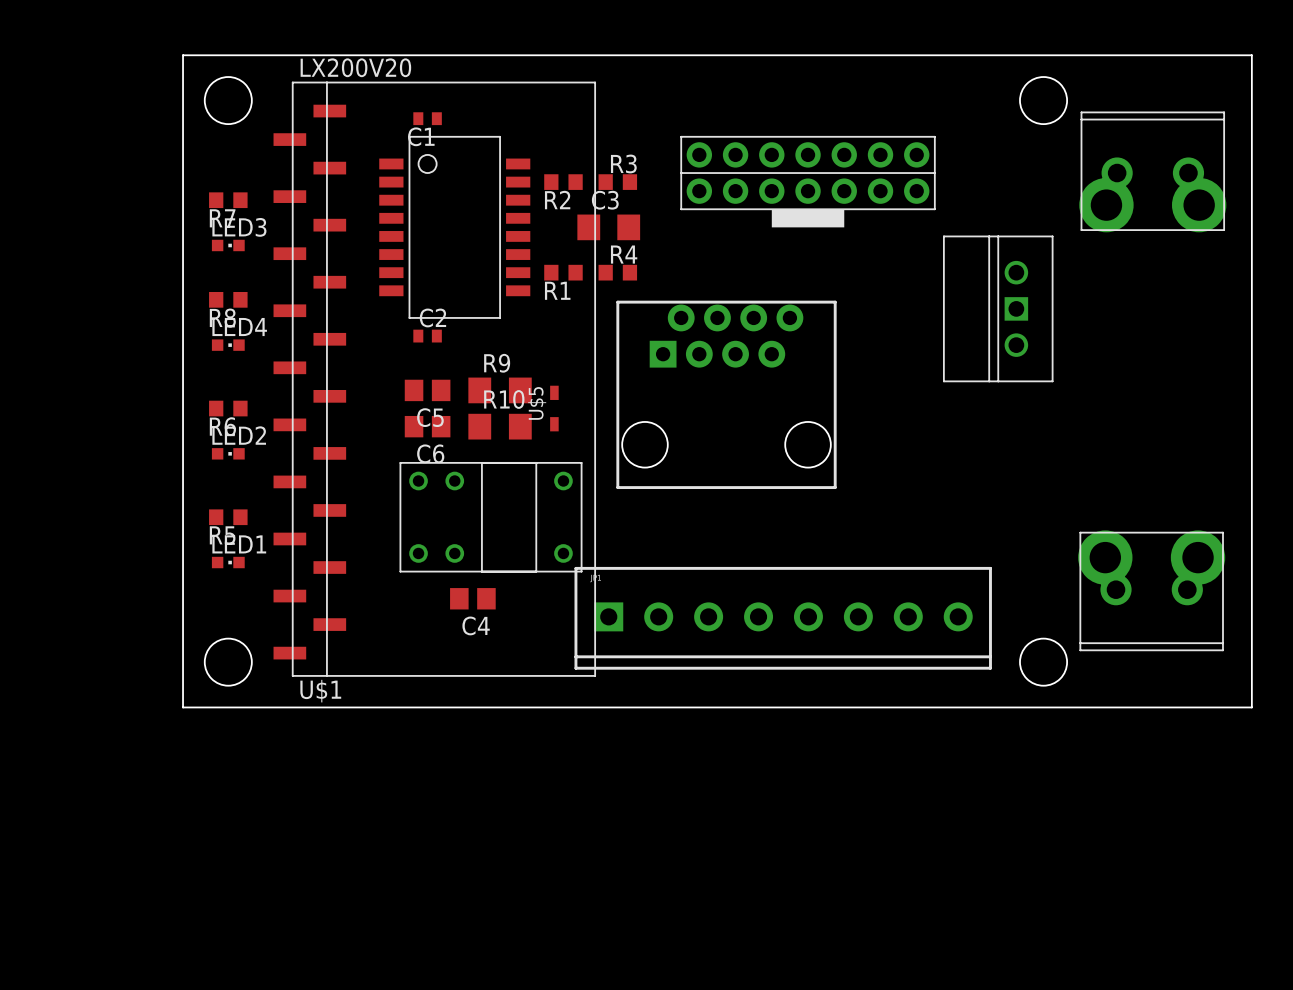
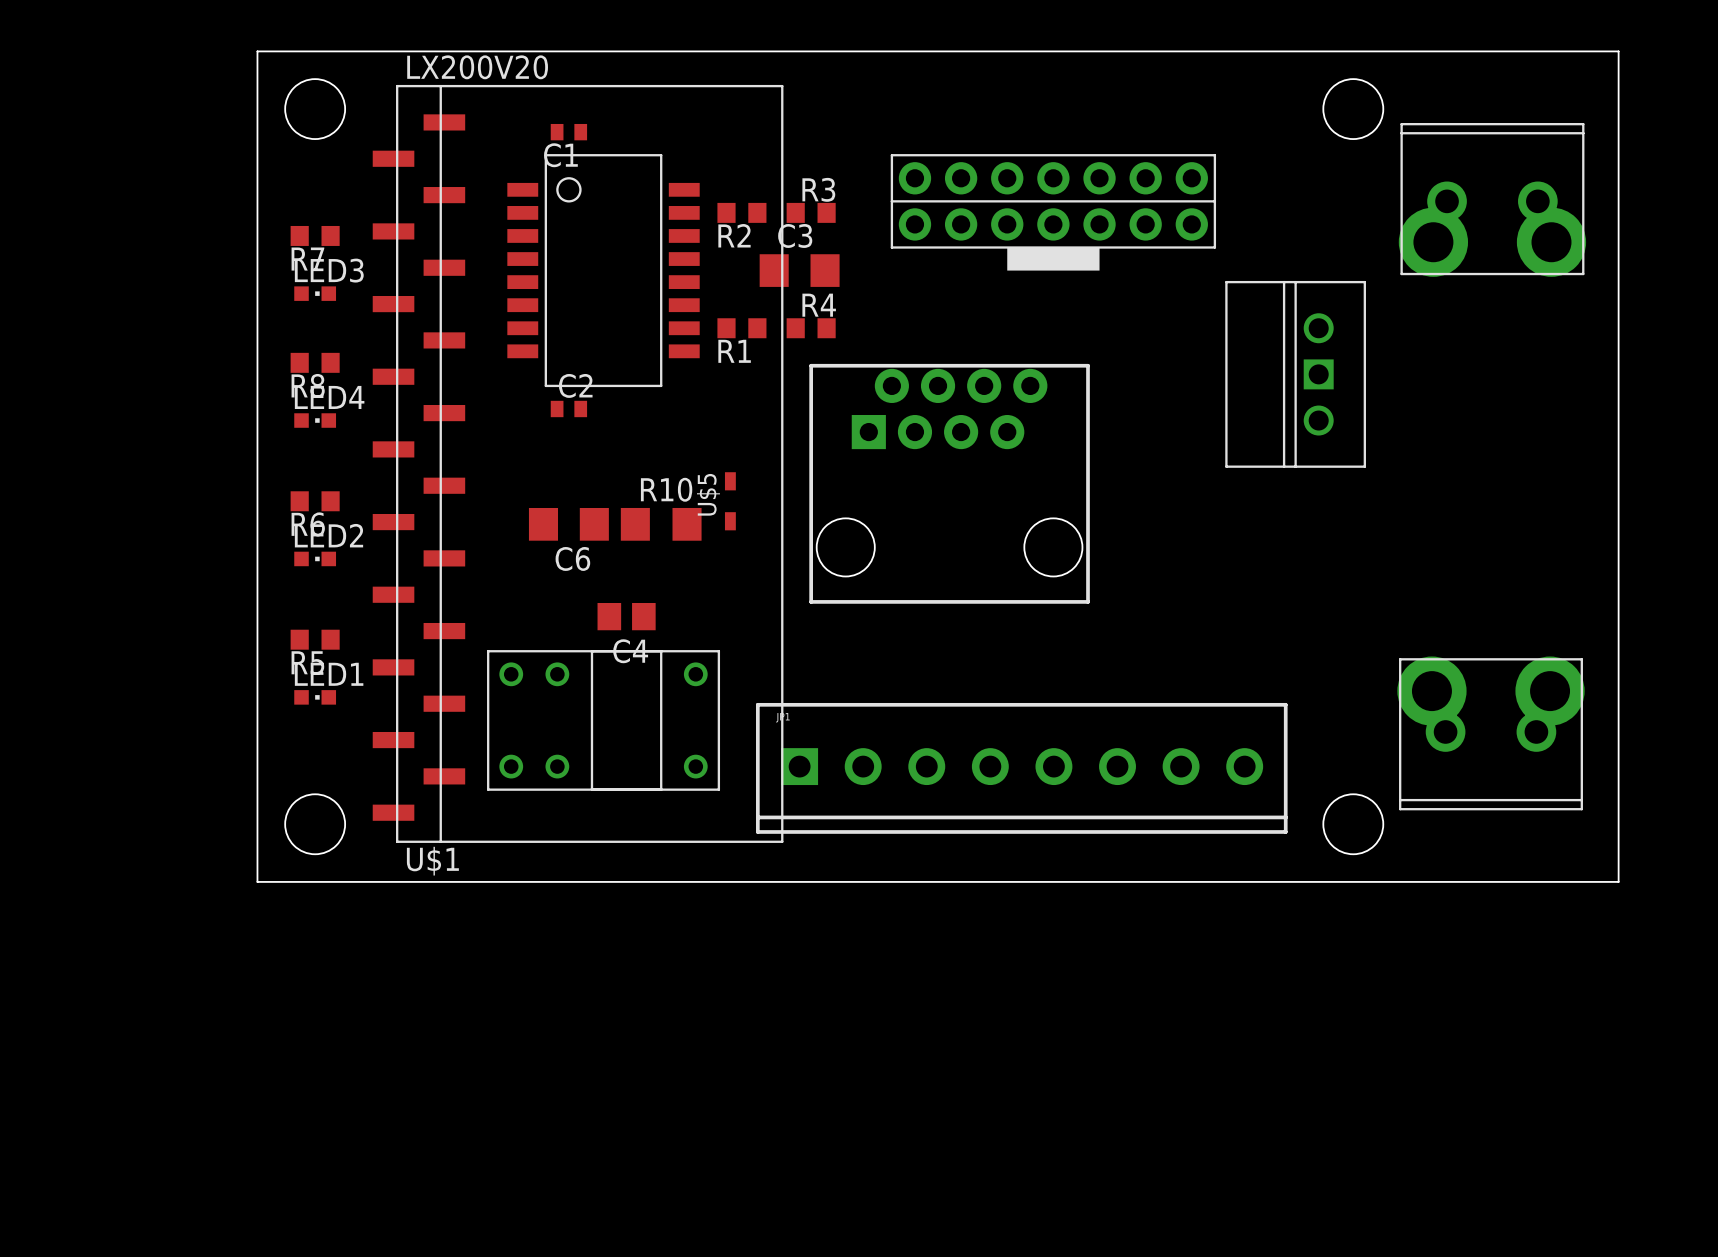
C5: (427, 390) -> none
R9: (500, 390) -> none
C6 footprint: [404, 415, 451, 438] -> [528, 507, 609, 541]
part position: (491, 517) -> (603, 720)
C4 position: (472, 598) -> (626, 616)

